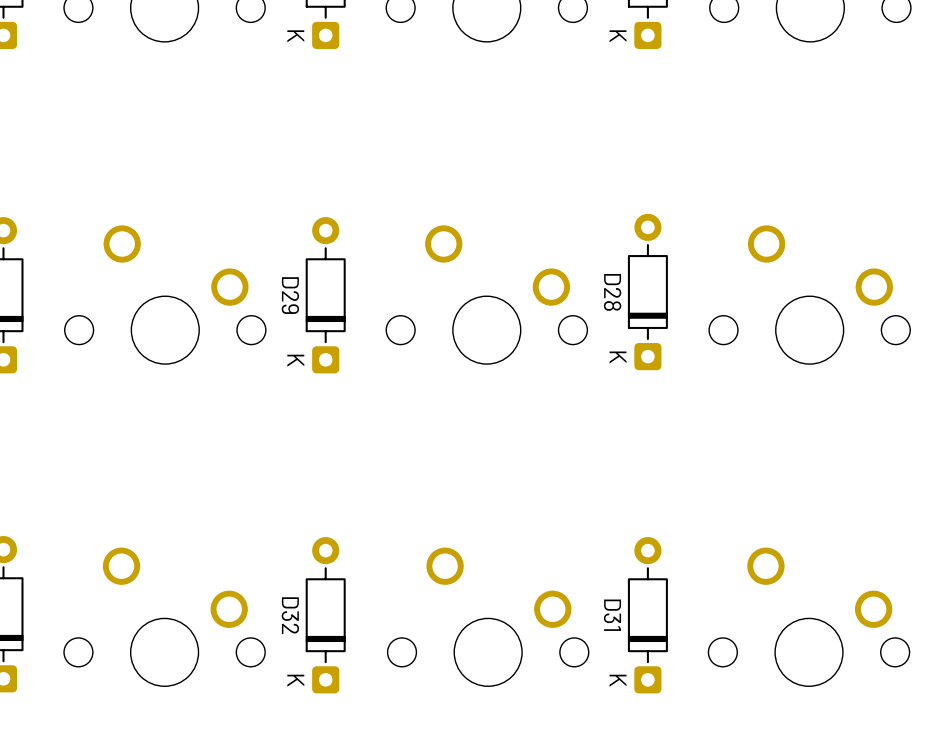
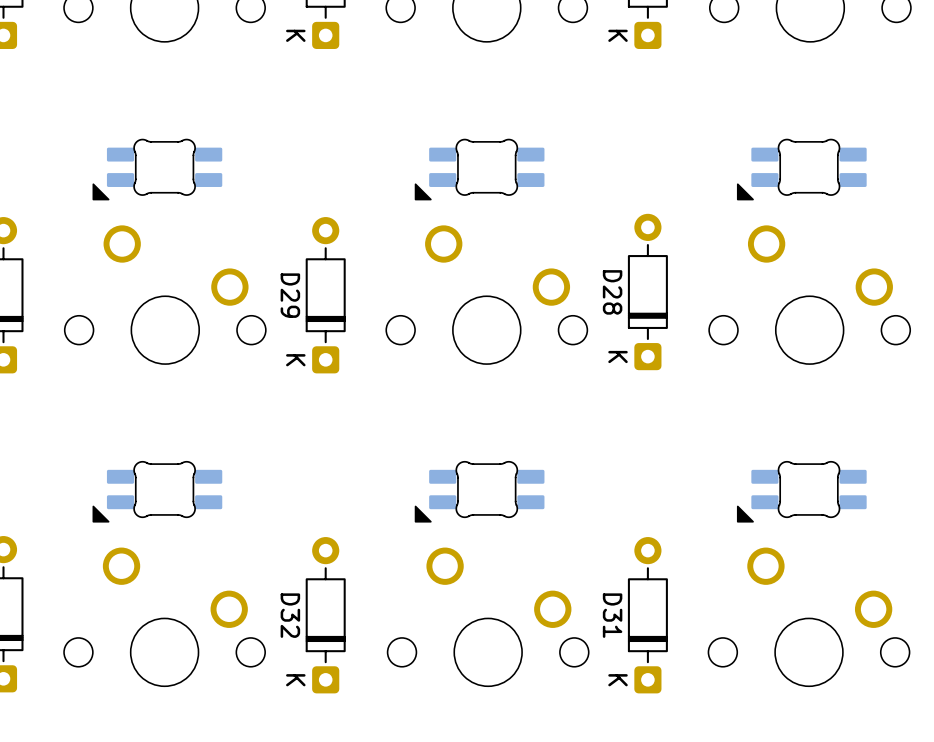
part: none -> (157, 169)
part: none -> (479, 169)
part: none -> (801, 169)
part: none -> (157, 491)
part: none -> (479, 491)
part: none -> (801, 491)

